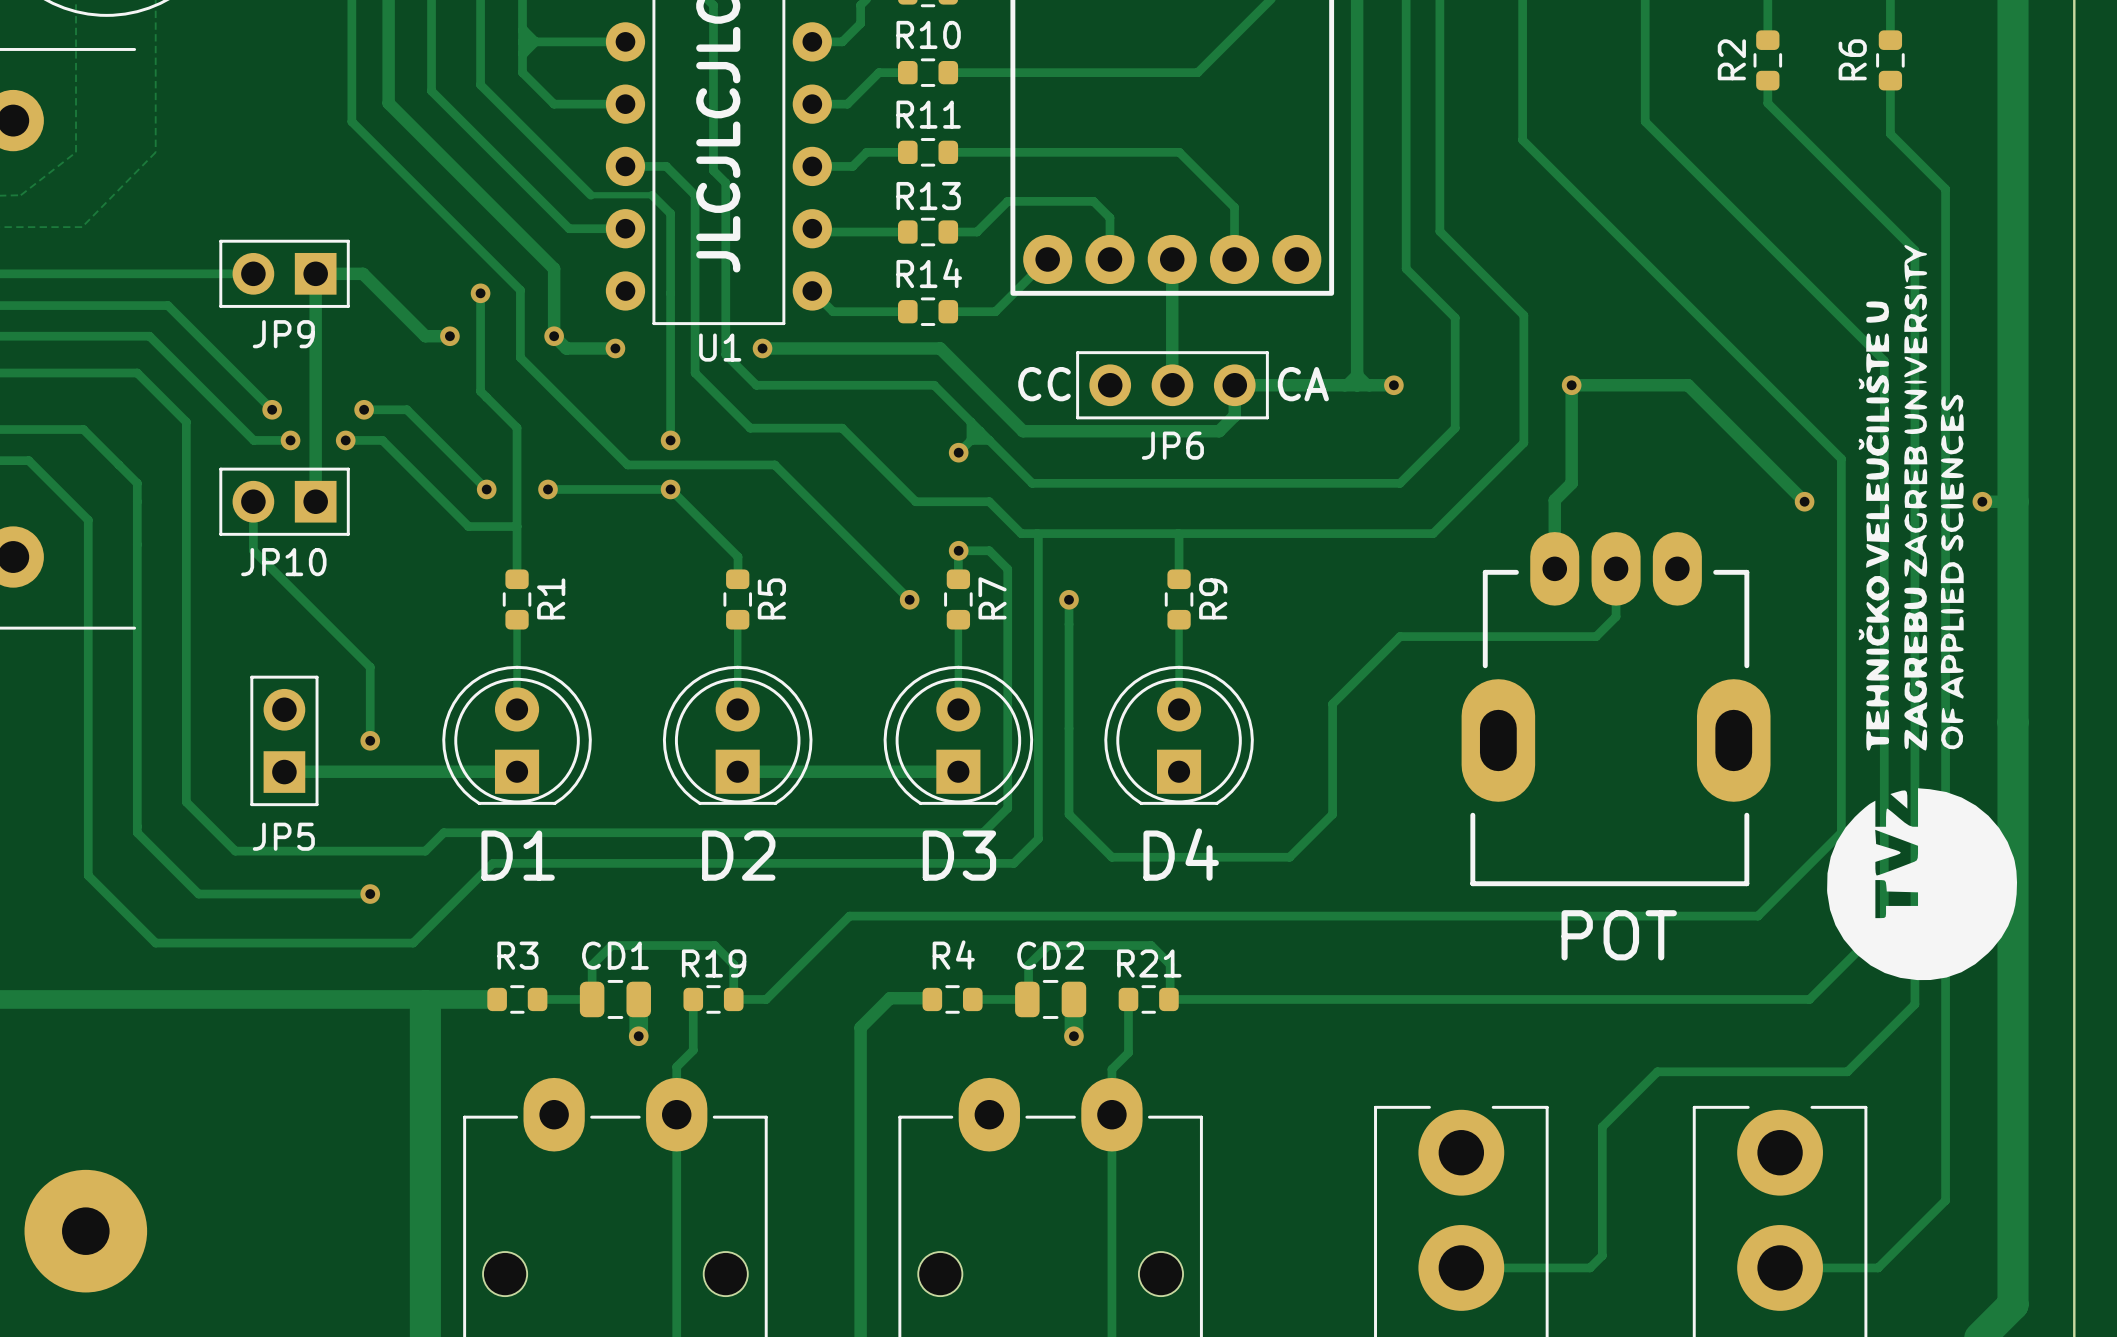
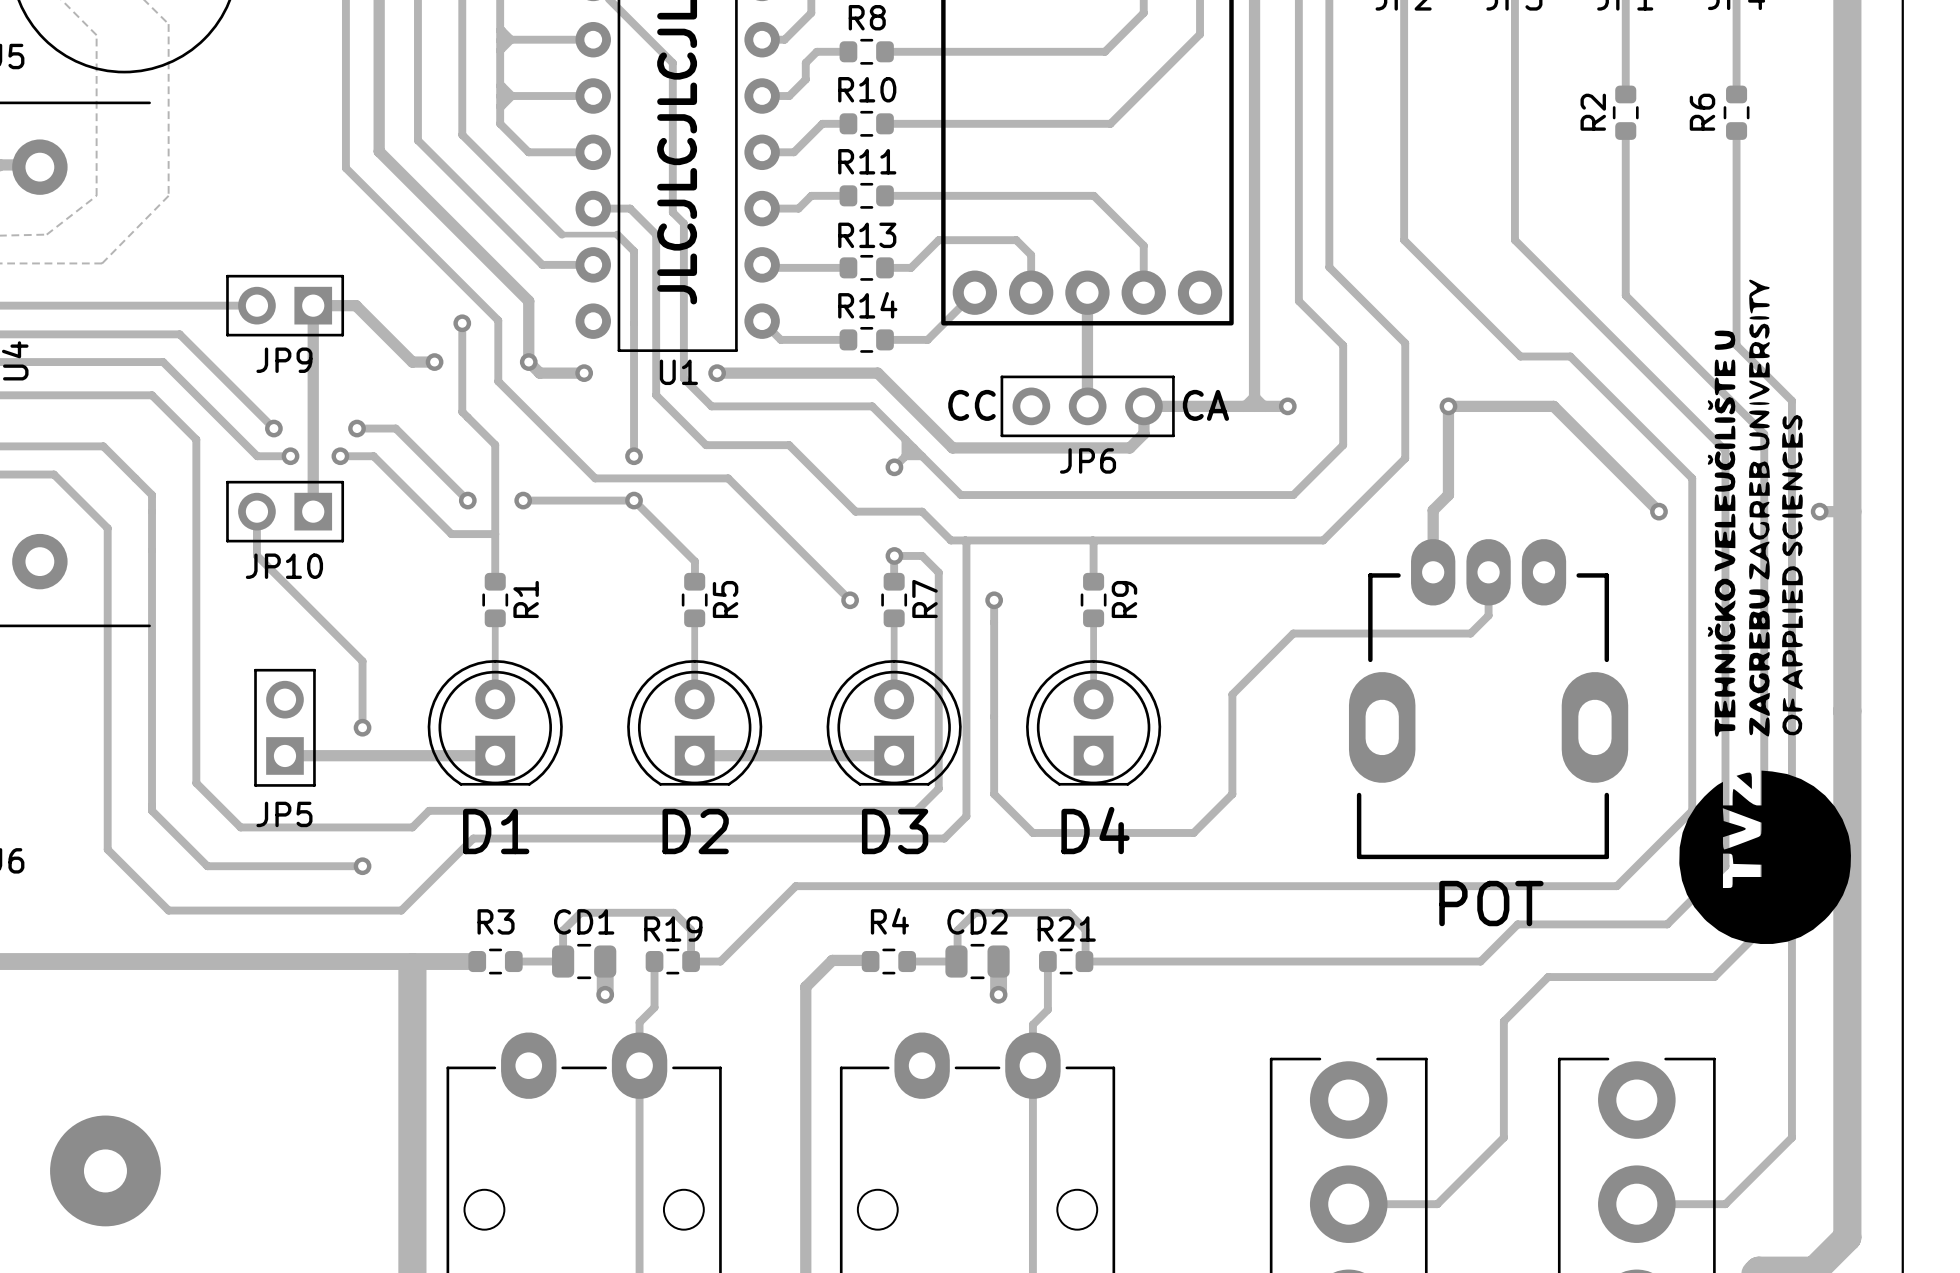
track: (1767, 103) (1914, 250) (1914, 1004) (1847, 1071) (1657, 1071) (1602, 1126) (1602, 1255) (1590, 1267) (1559, 1267) -> (1625, 151) (1625, 295) (1764, 434) (1764, 927) (1714, 977) (1548, 977) (1503, 1021) (1503, 1137) (1437, 1204)
track: (1645, 121) (1884, 360) (1884, 924) (1809, 999) (1607, 999) -> (1514, 168) (1514, 240) (1725, 450) (1725, 866) (1667, 924) (1517, 924) (1480, 961)
track: (1890, 133) (1945, 189) (1945, 1200) -> (1736, 179) (1736, 345) (1791, 400) (1791, 1137) (1786, 1143)
track: (1522, 140) (1841, 458) (1841, 464) -> (1404, 184) (1404, 240) (1520, 356) (1570, 356) (1692, 478)

